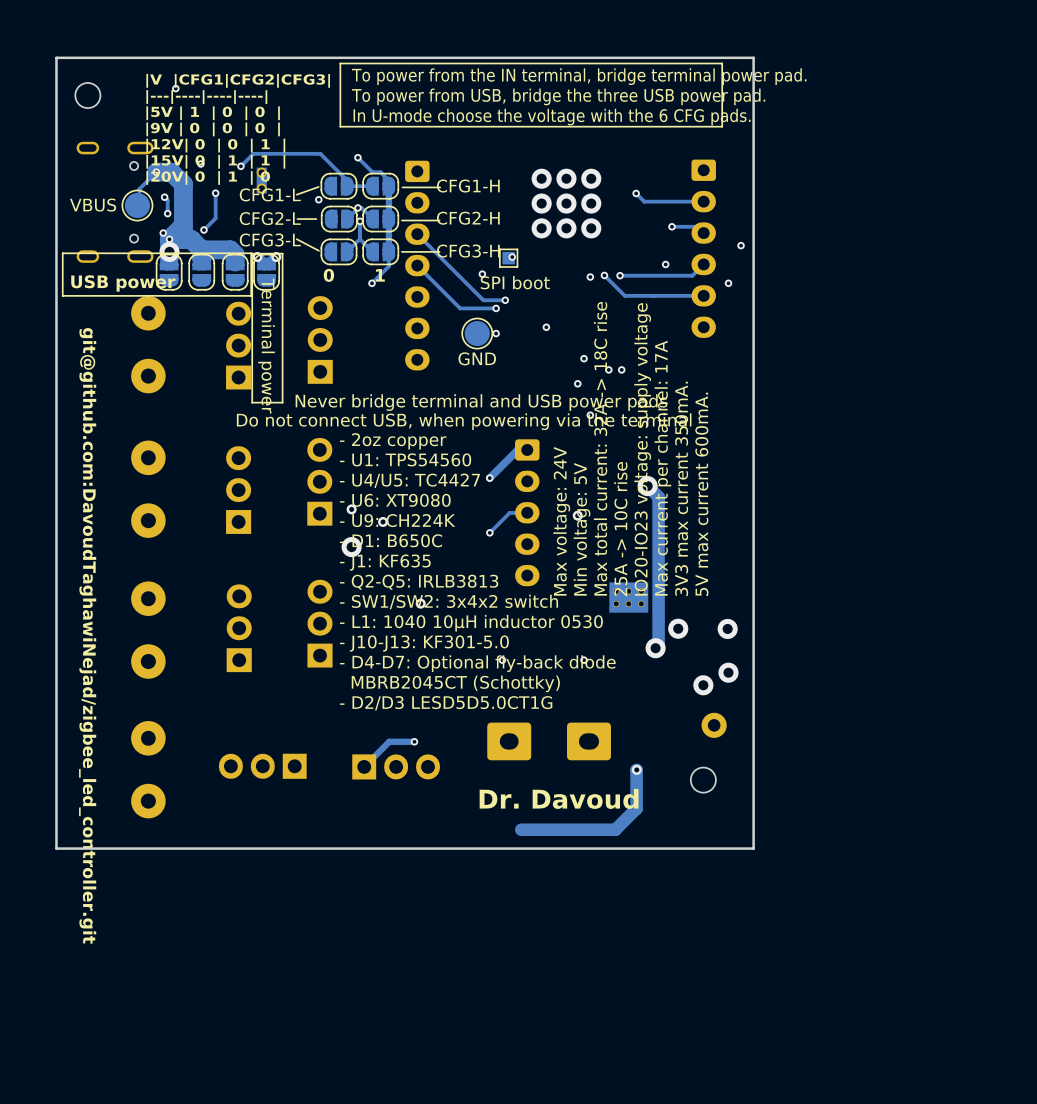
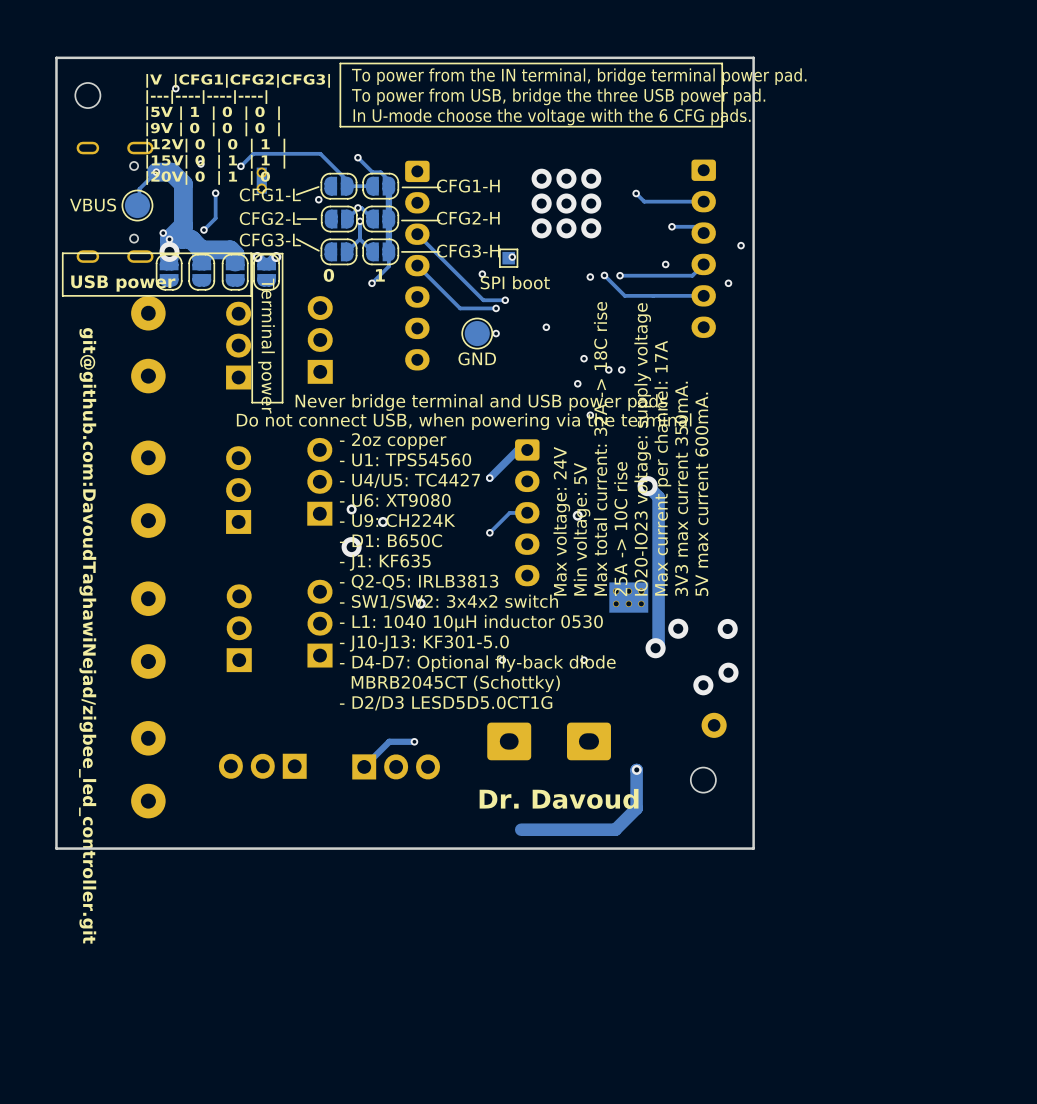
track: (164, 197) (167, 200) (167, 213) -> none
via: (164, 197) -> none
via: (167, 213) -> none

